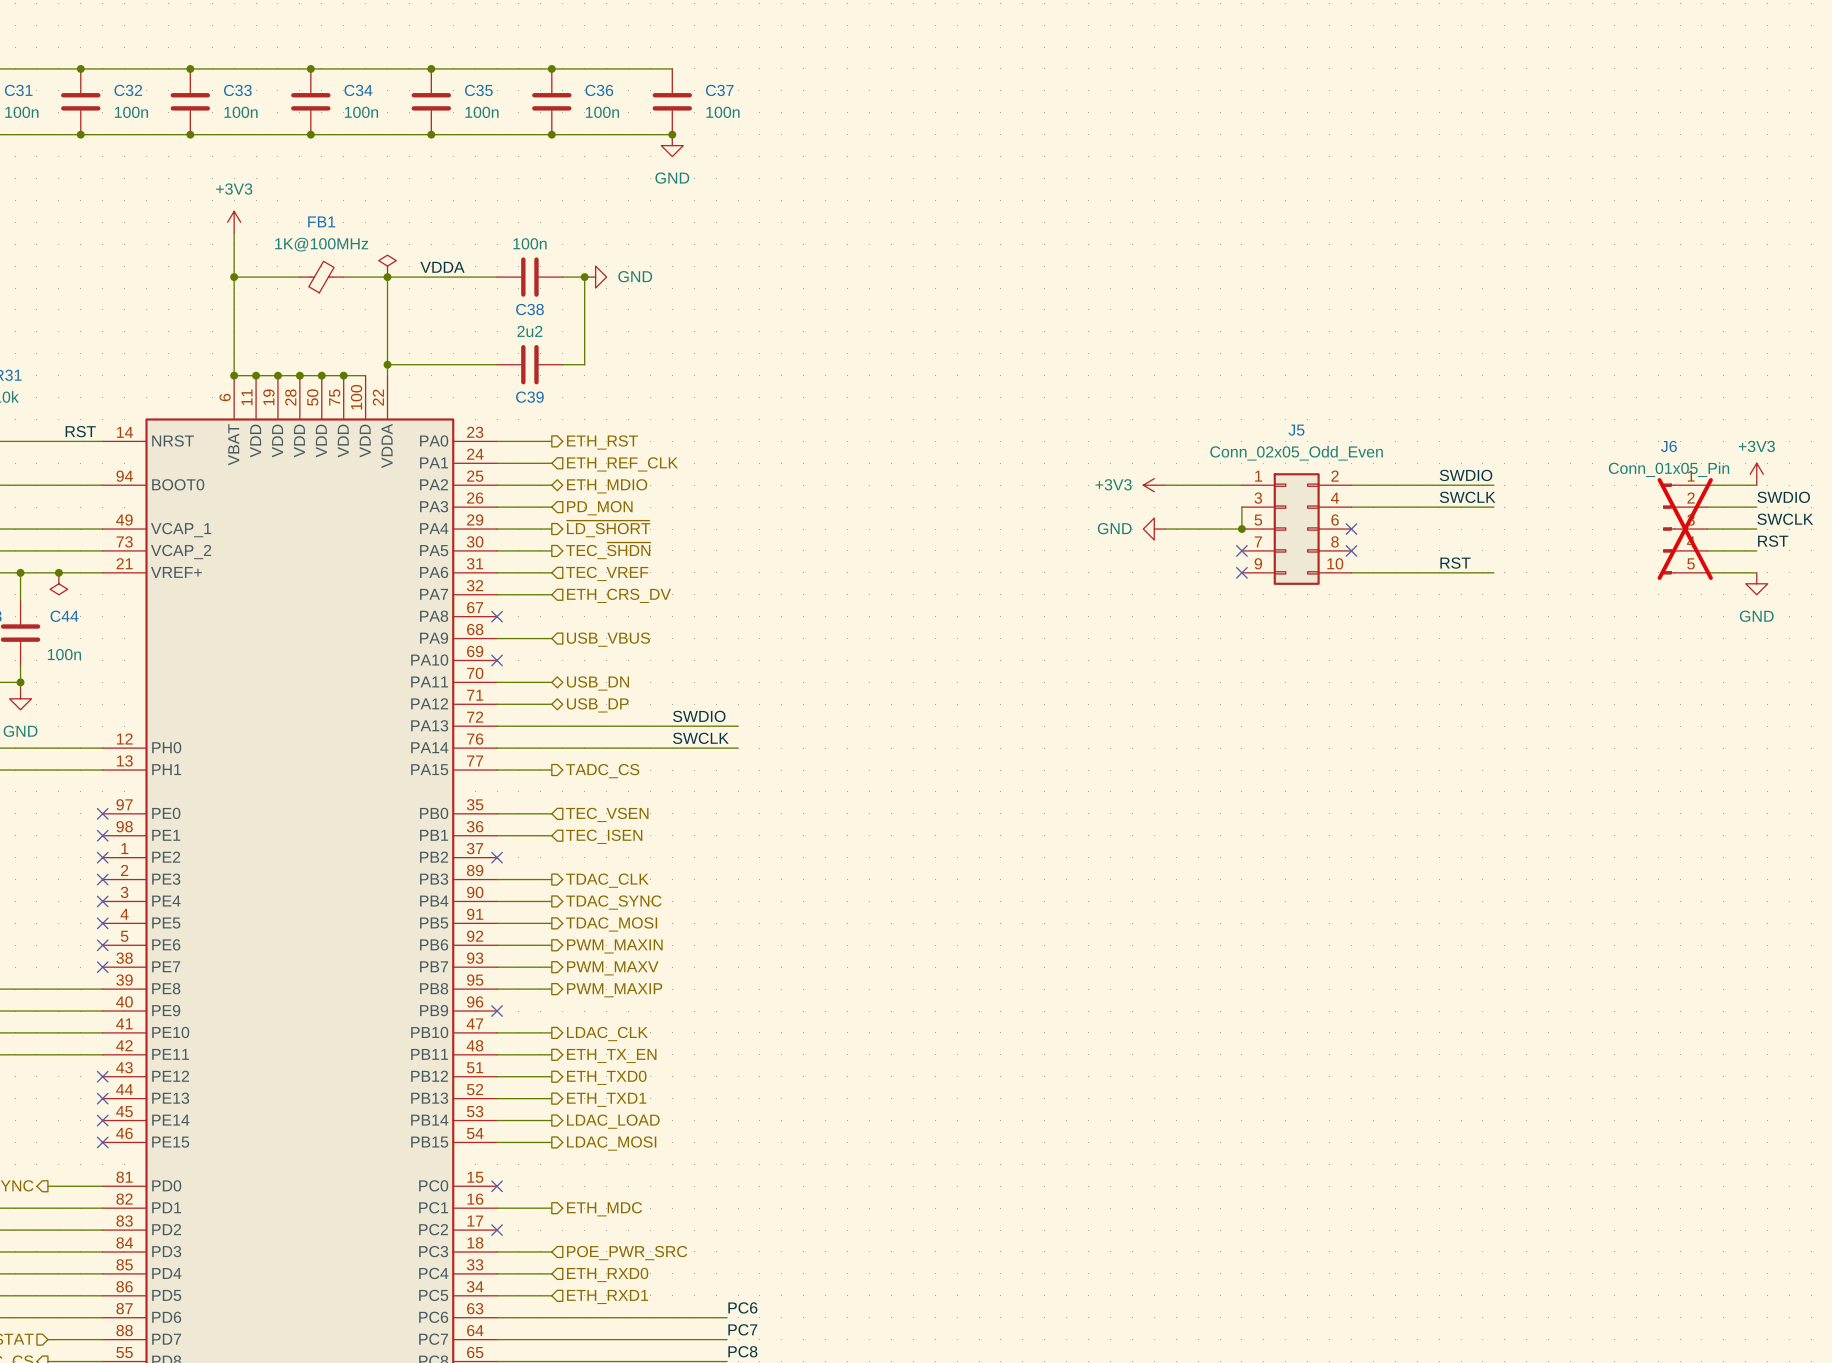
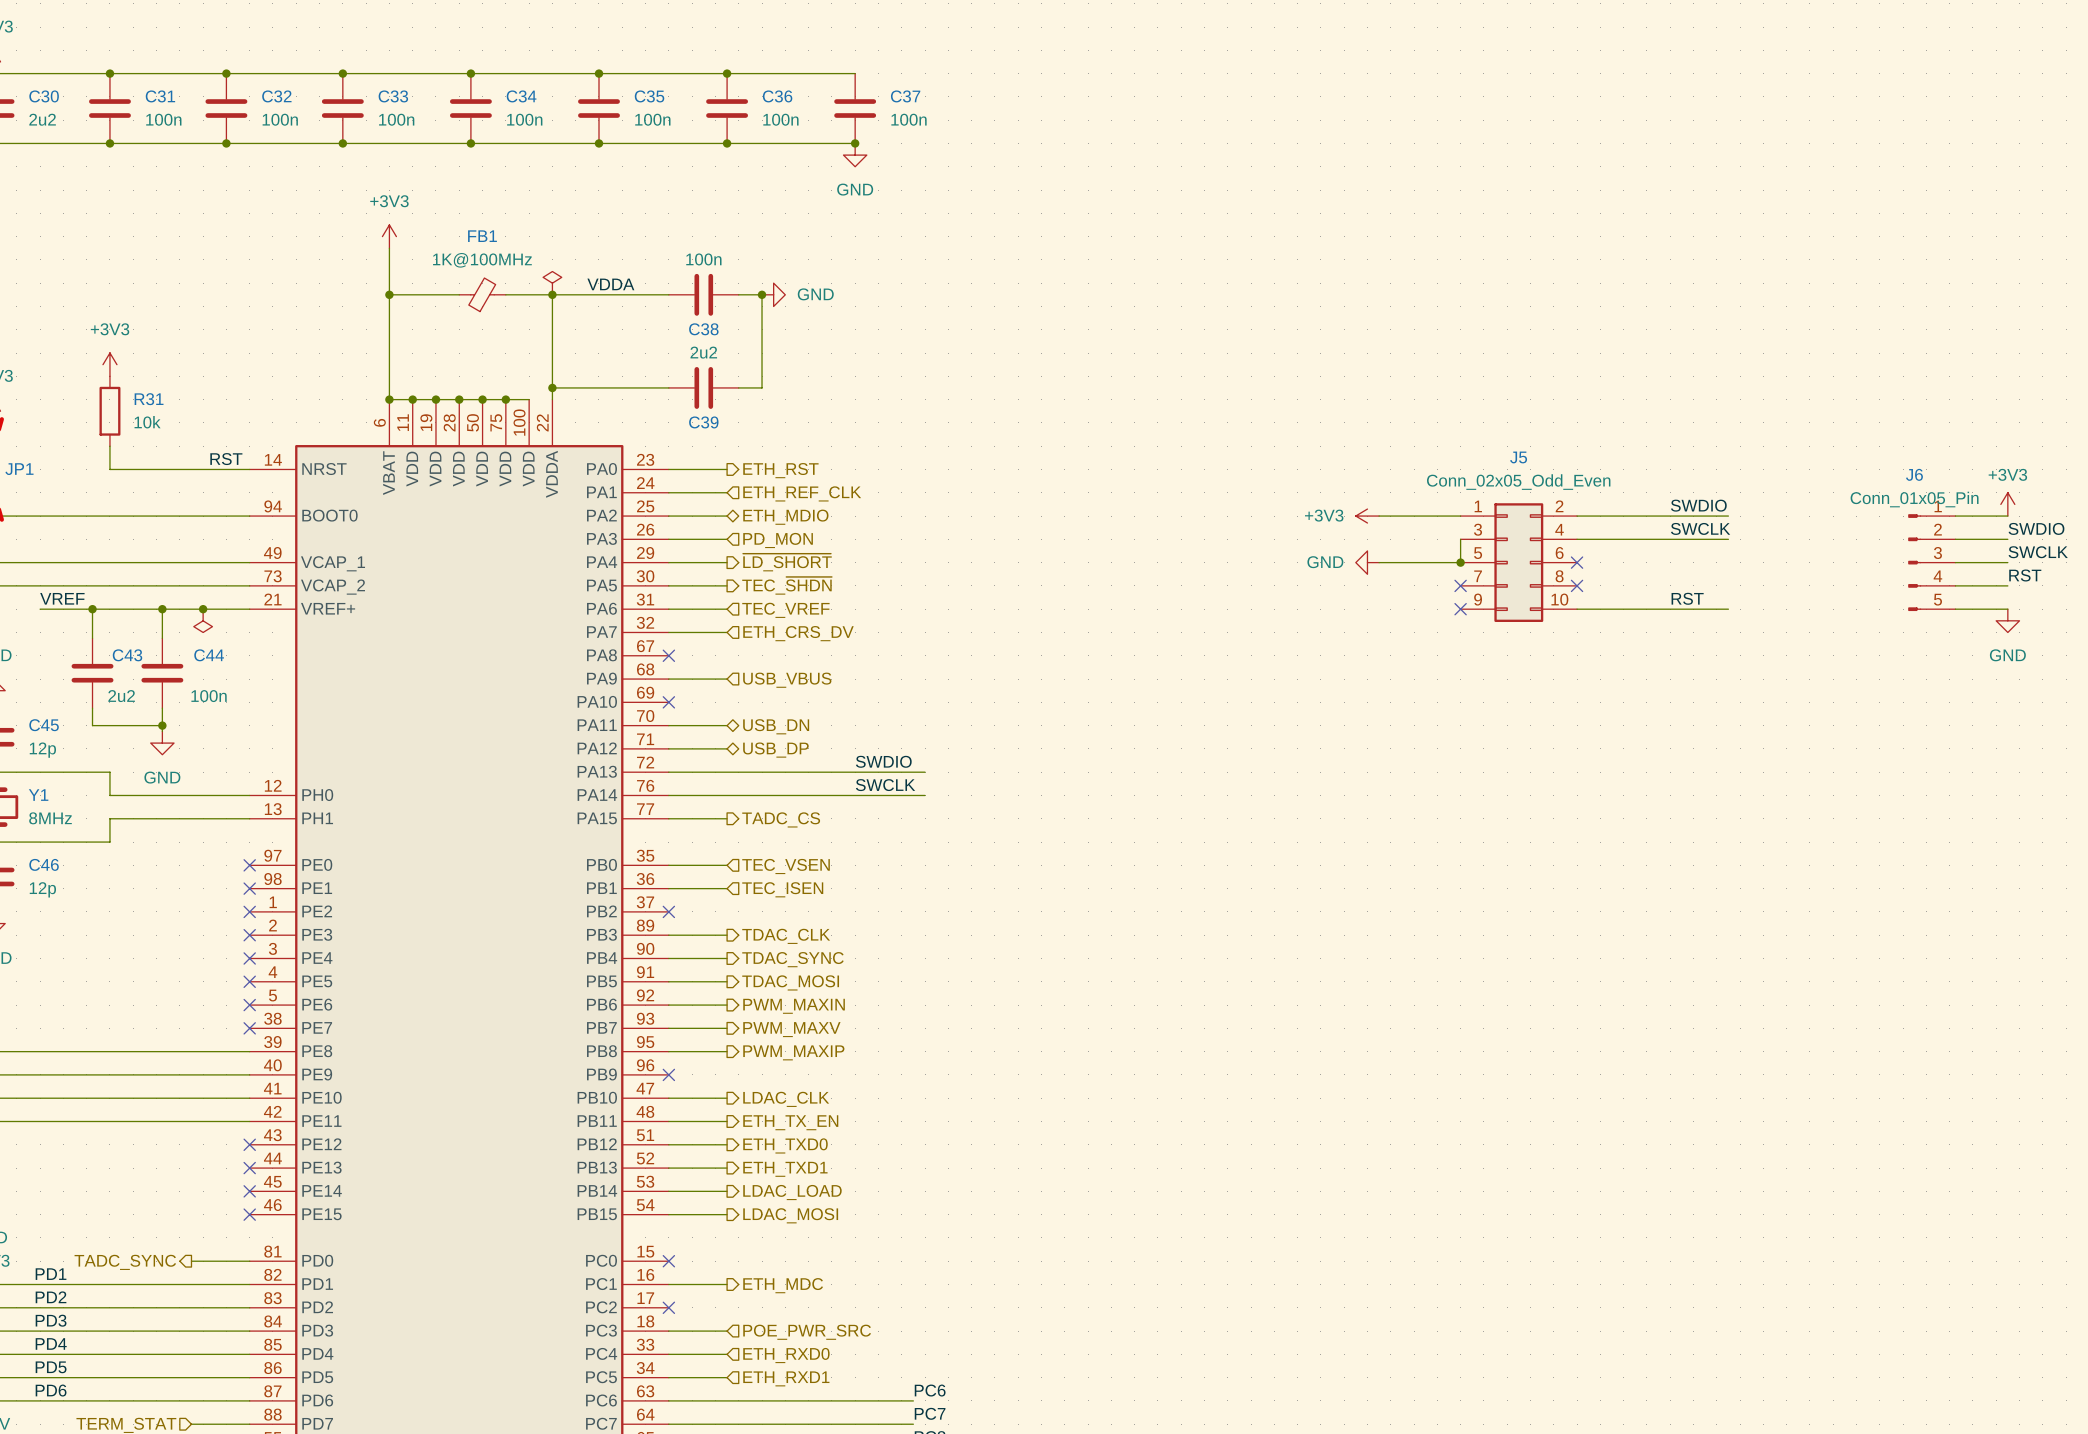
J6 do-not-place cross: (1685, 529) -> none

